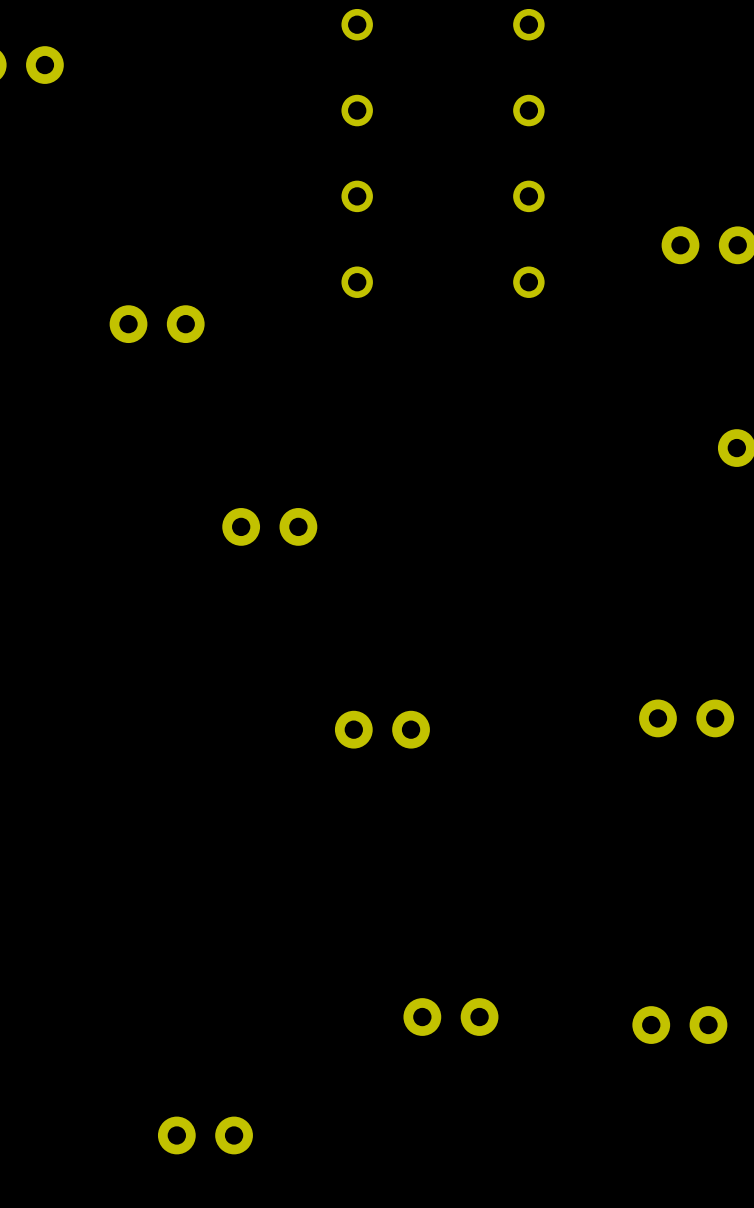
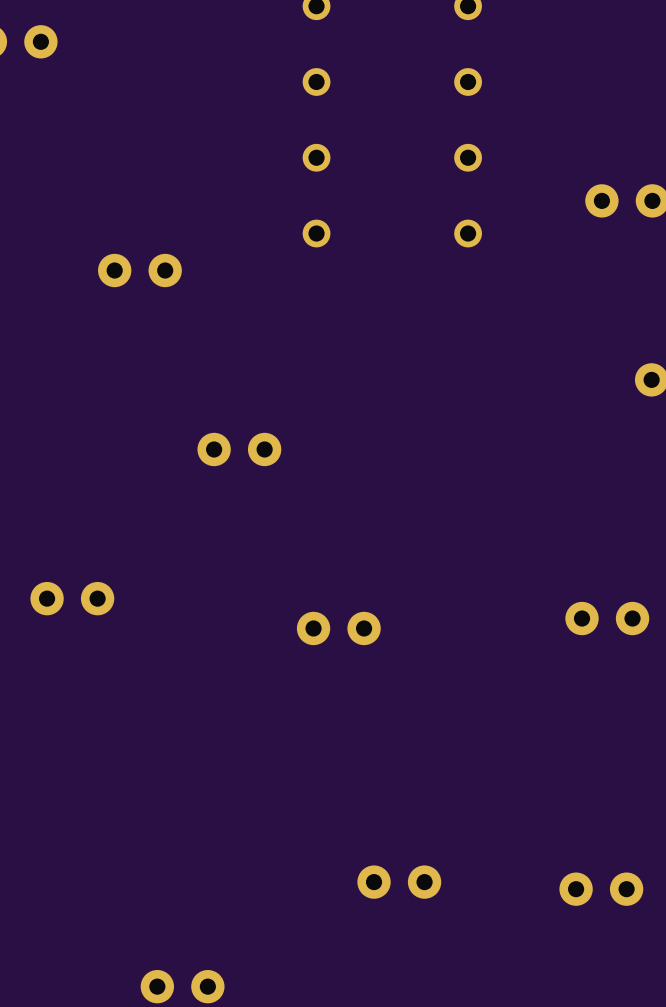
part: none -> (72, 598)

